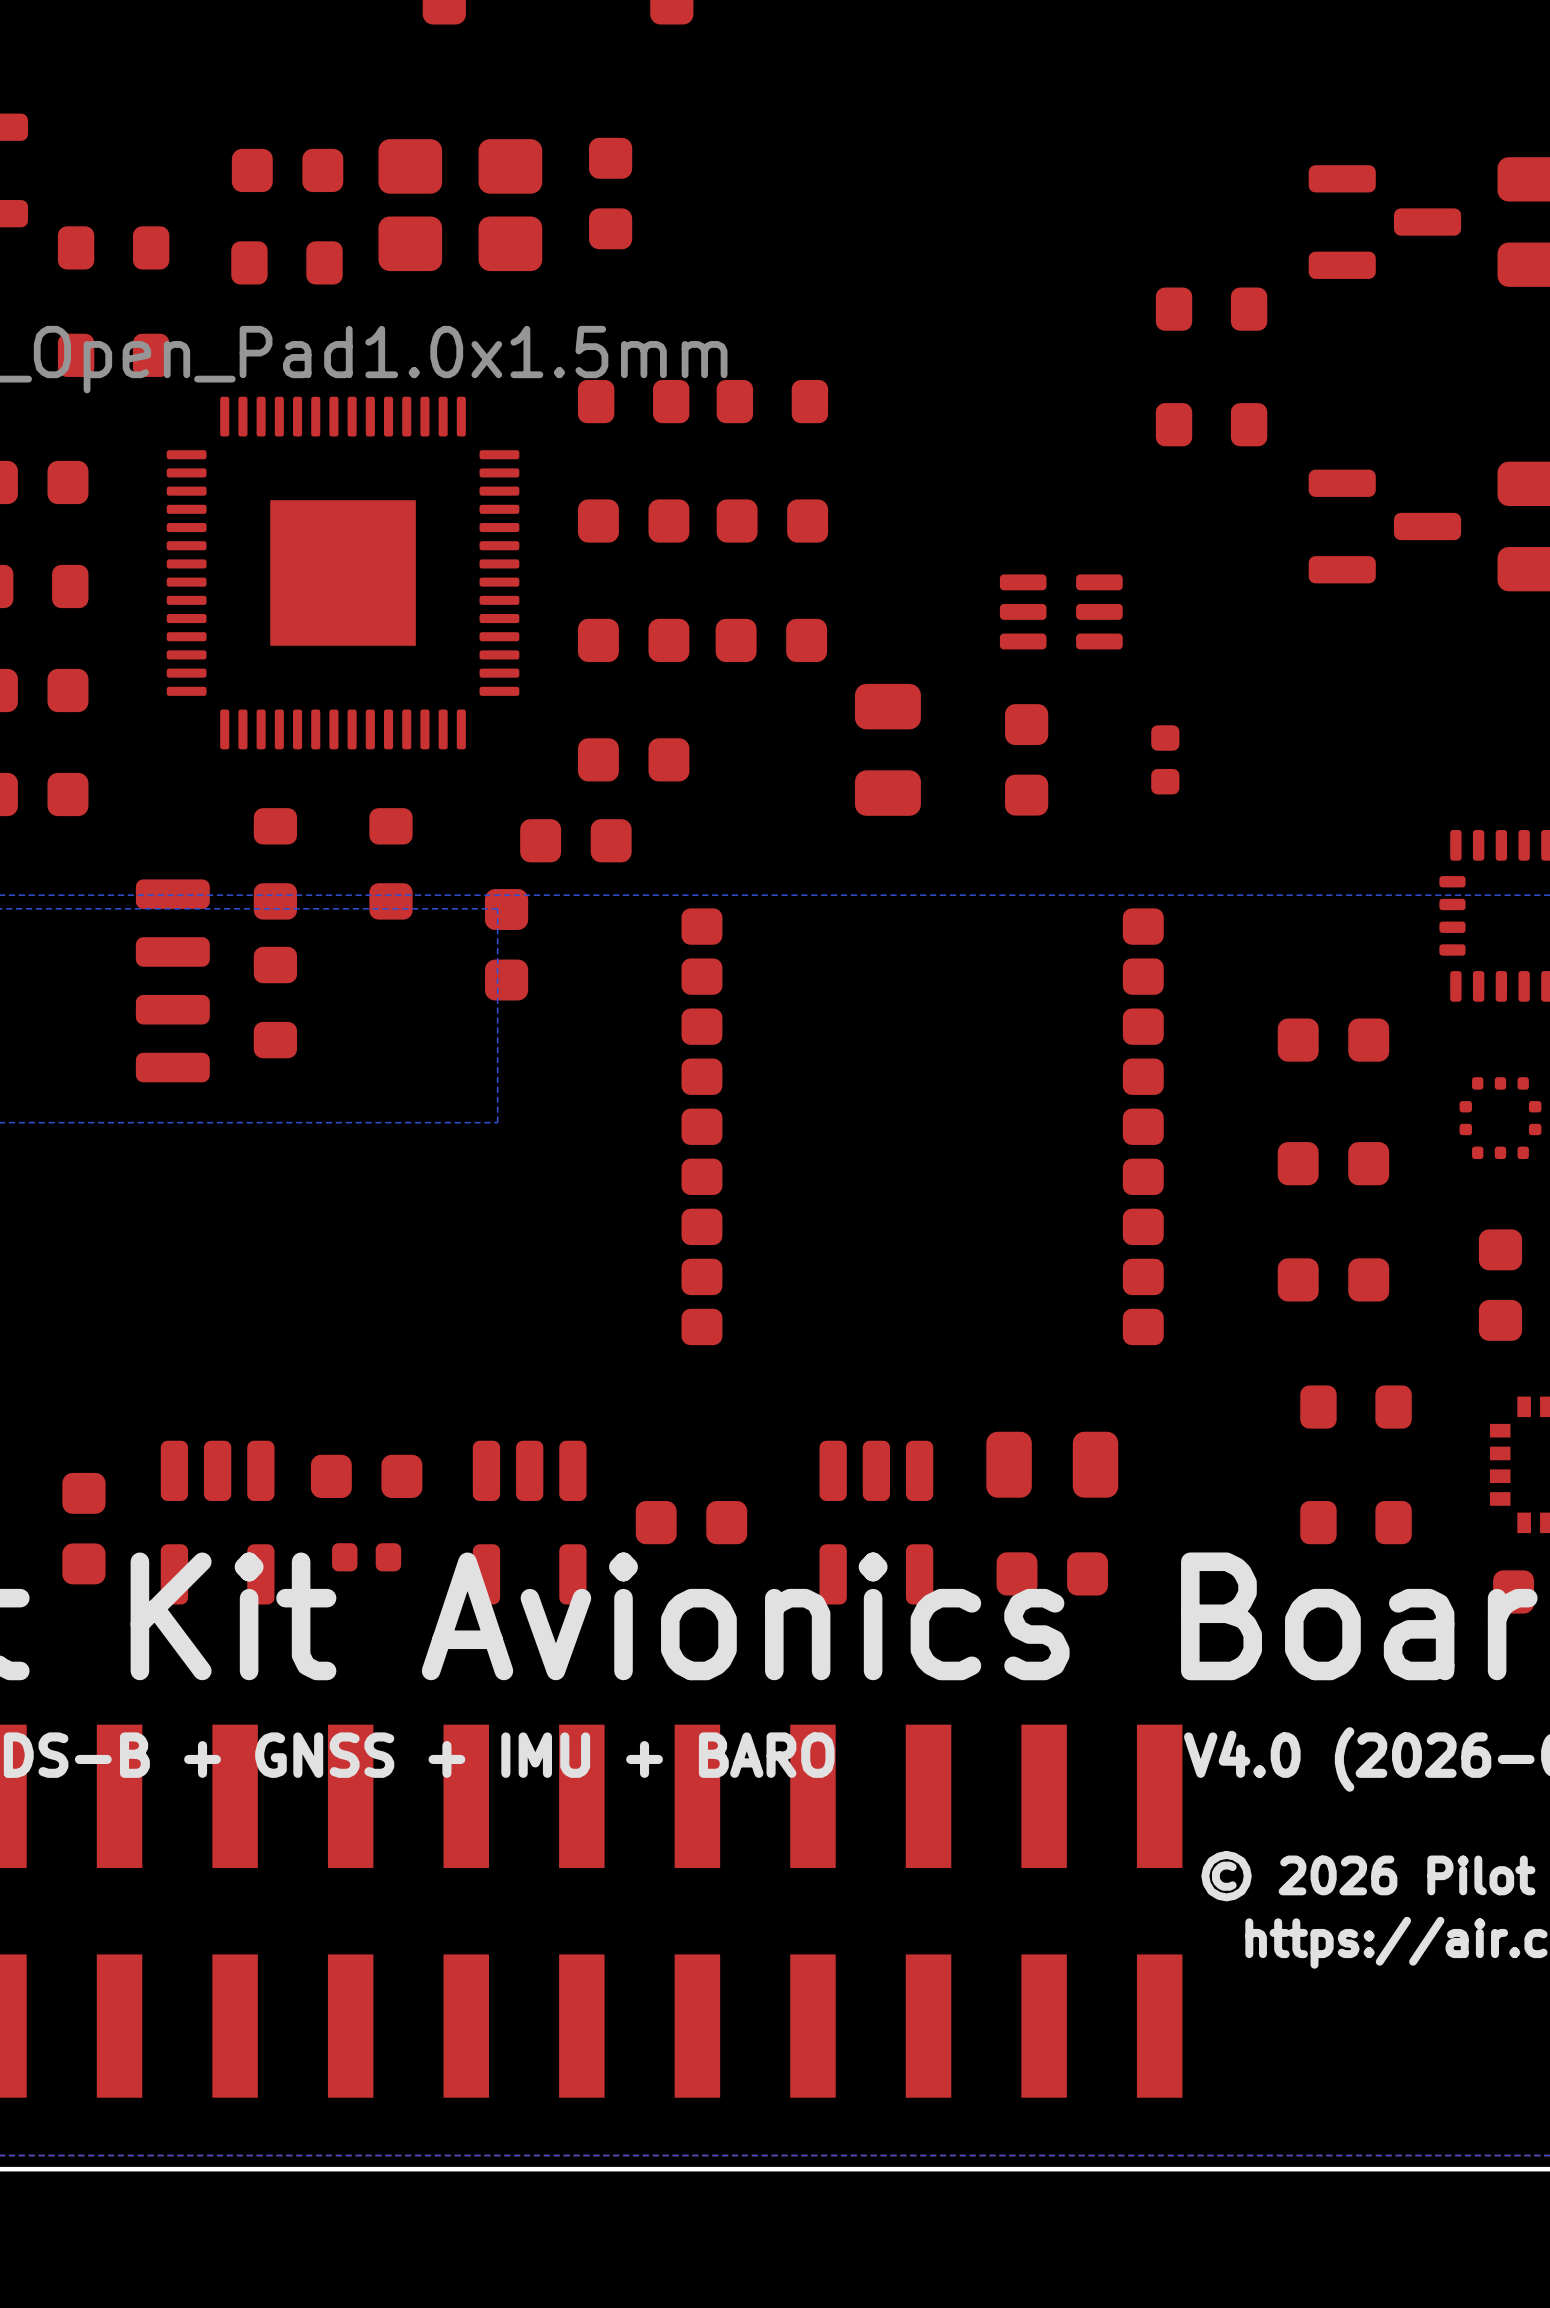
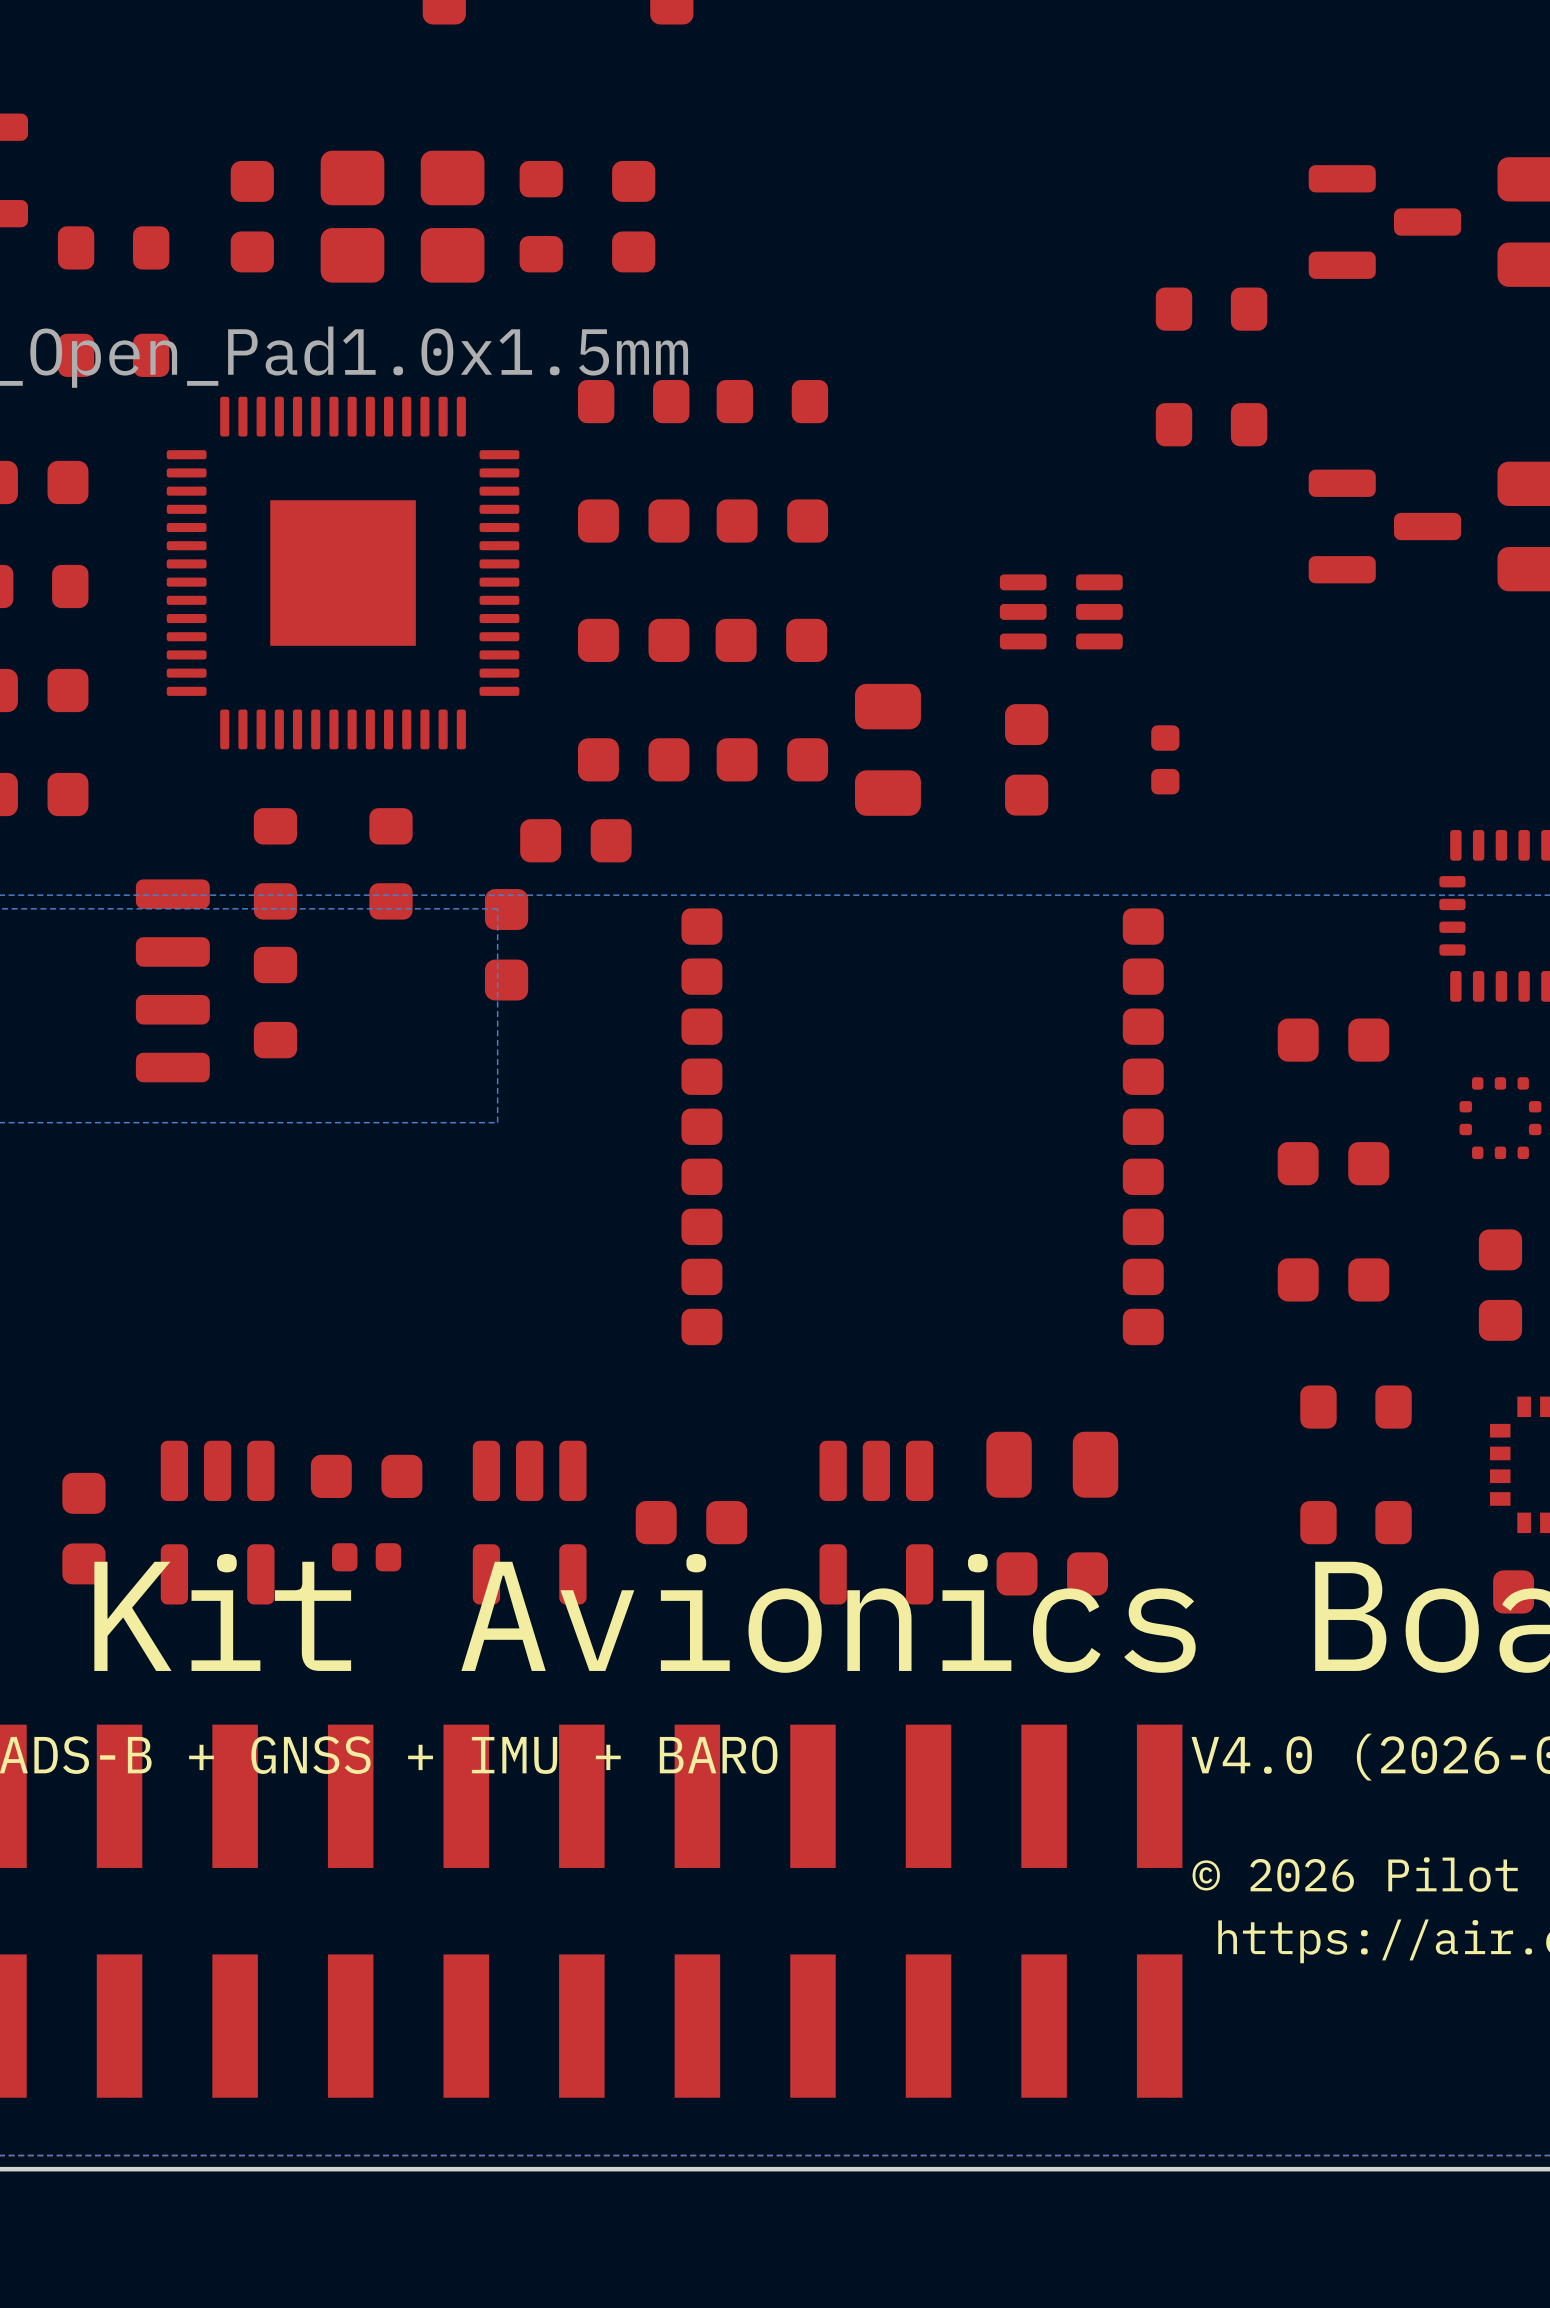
part rotation: 0° (287, 170) -> 90° clockwise (252, 216)
part position: (610, 193) -> (633, 216)
part position: (460, 205) -> (402, 216)
part rotation: 0° (286, 262) -> 90° clockwise (541, 216)
part position: (286, 262) -> (541, 216)
part: none -> (772, 759)

